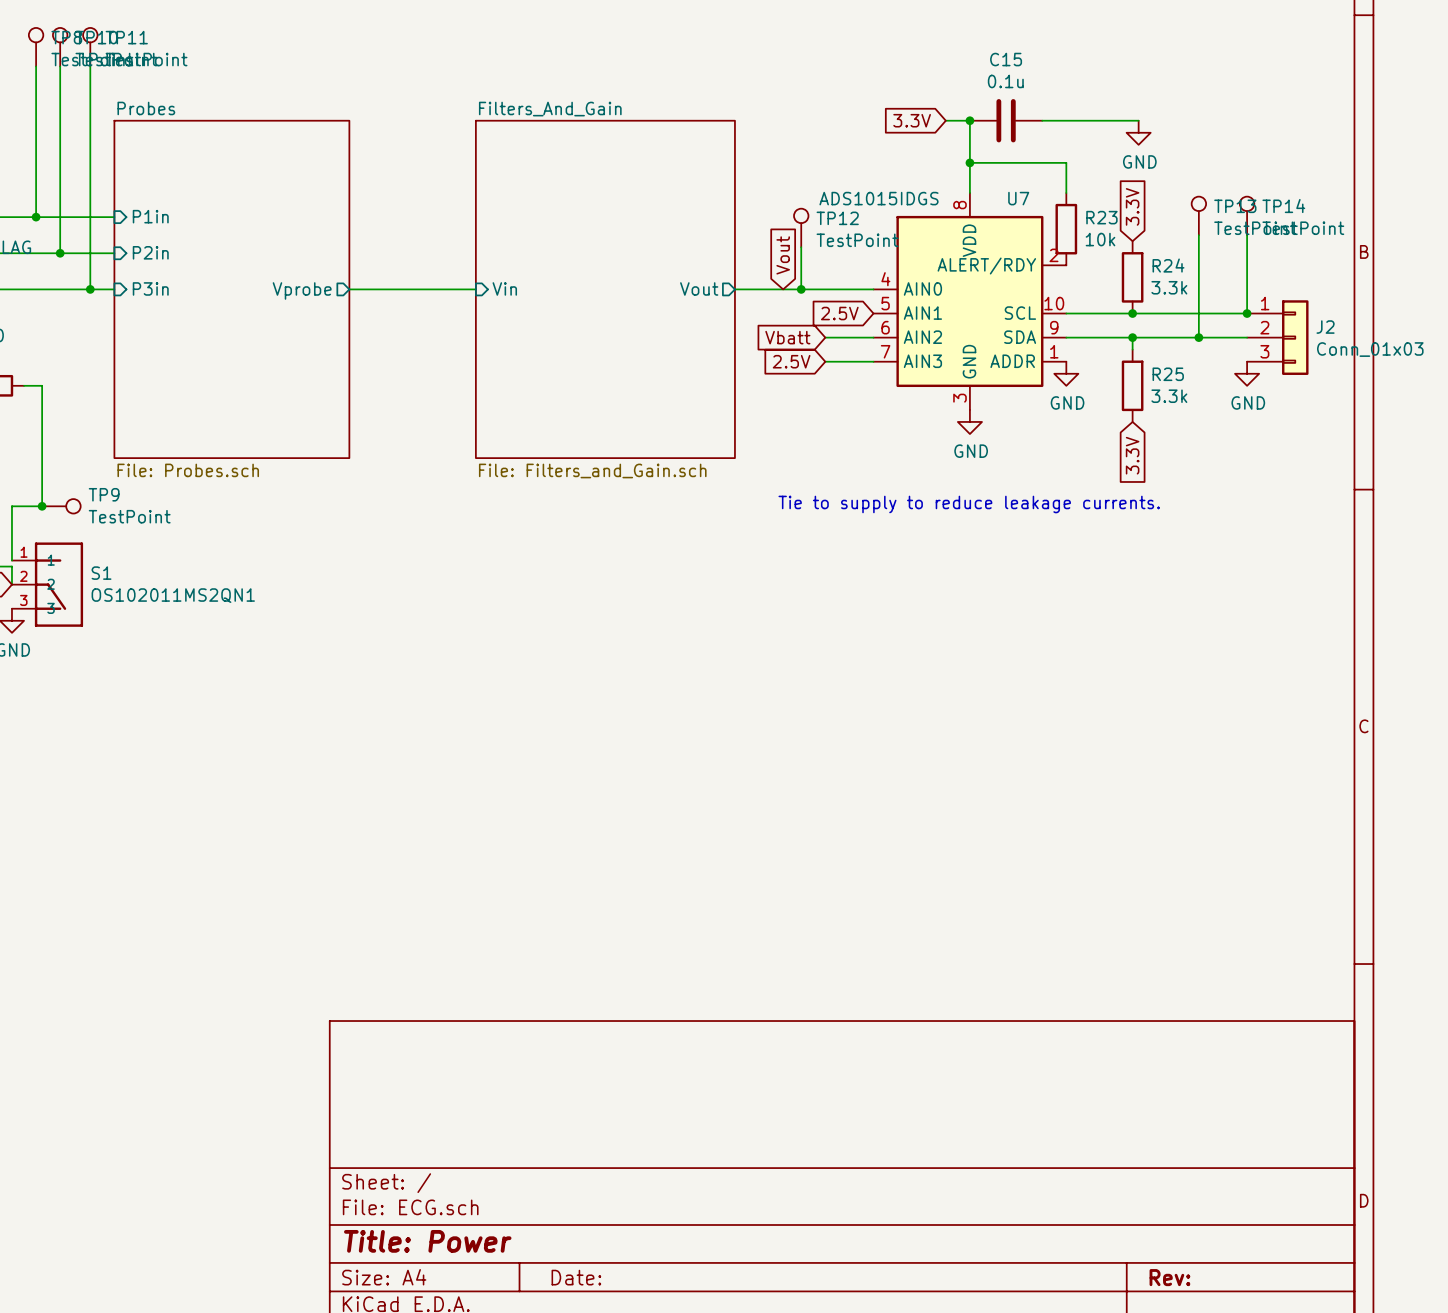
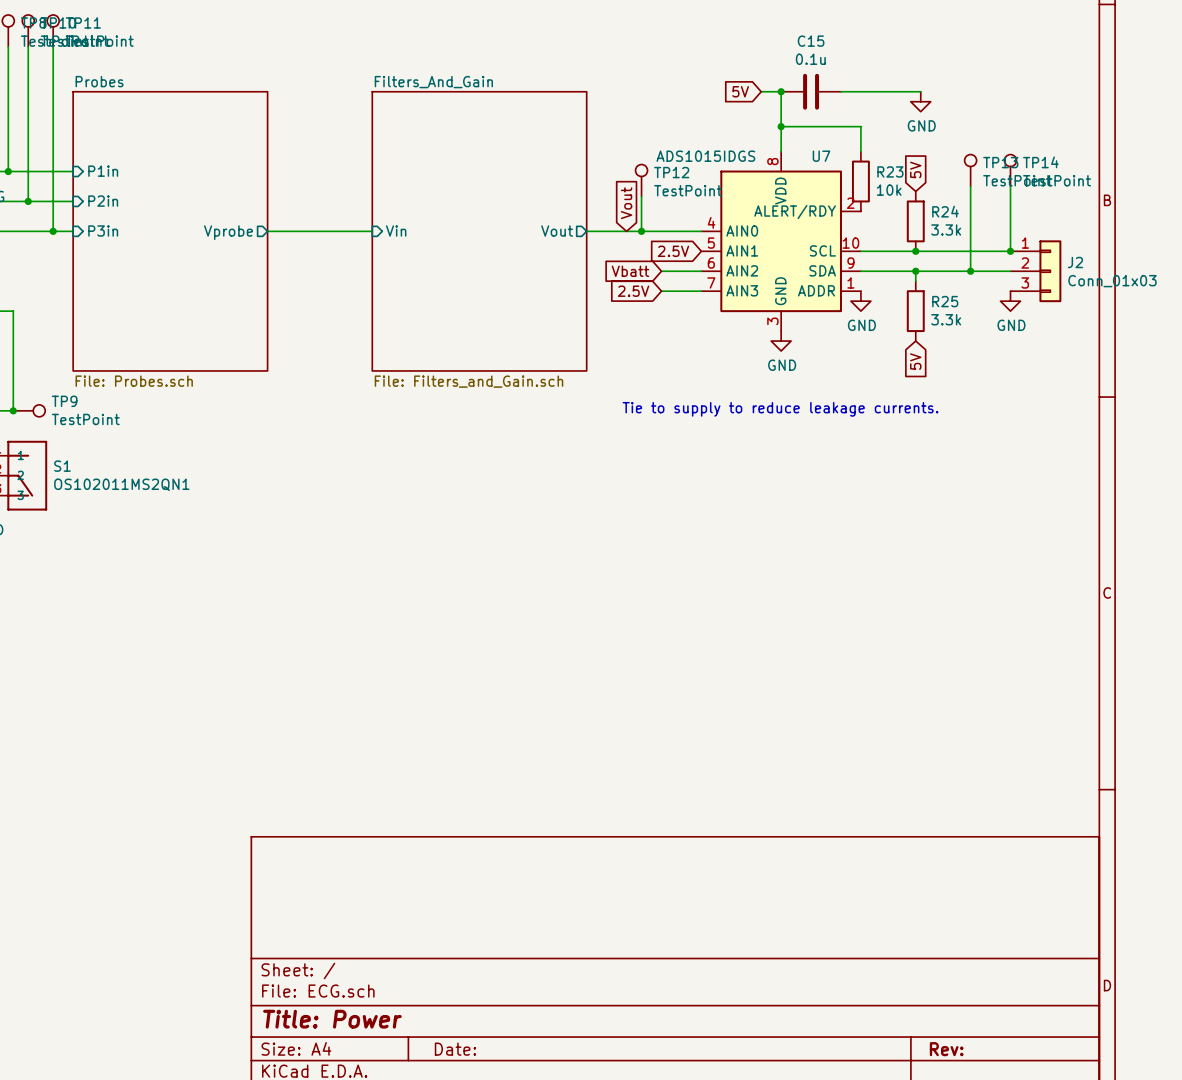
global label: 3.3V (912, 120) -> 5V (740, 91)
global label: 3.3V (1132, 206) -> 5V (915, 169)
global label: 3.3V (1132, 455) -> 5V (915, 361)

